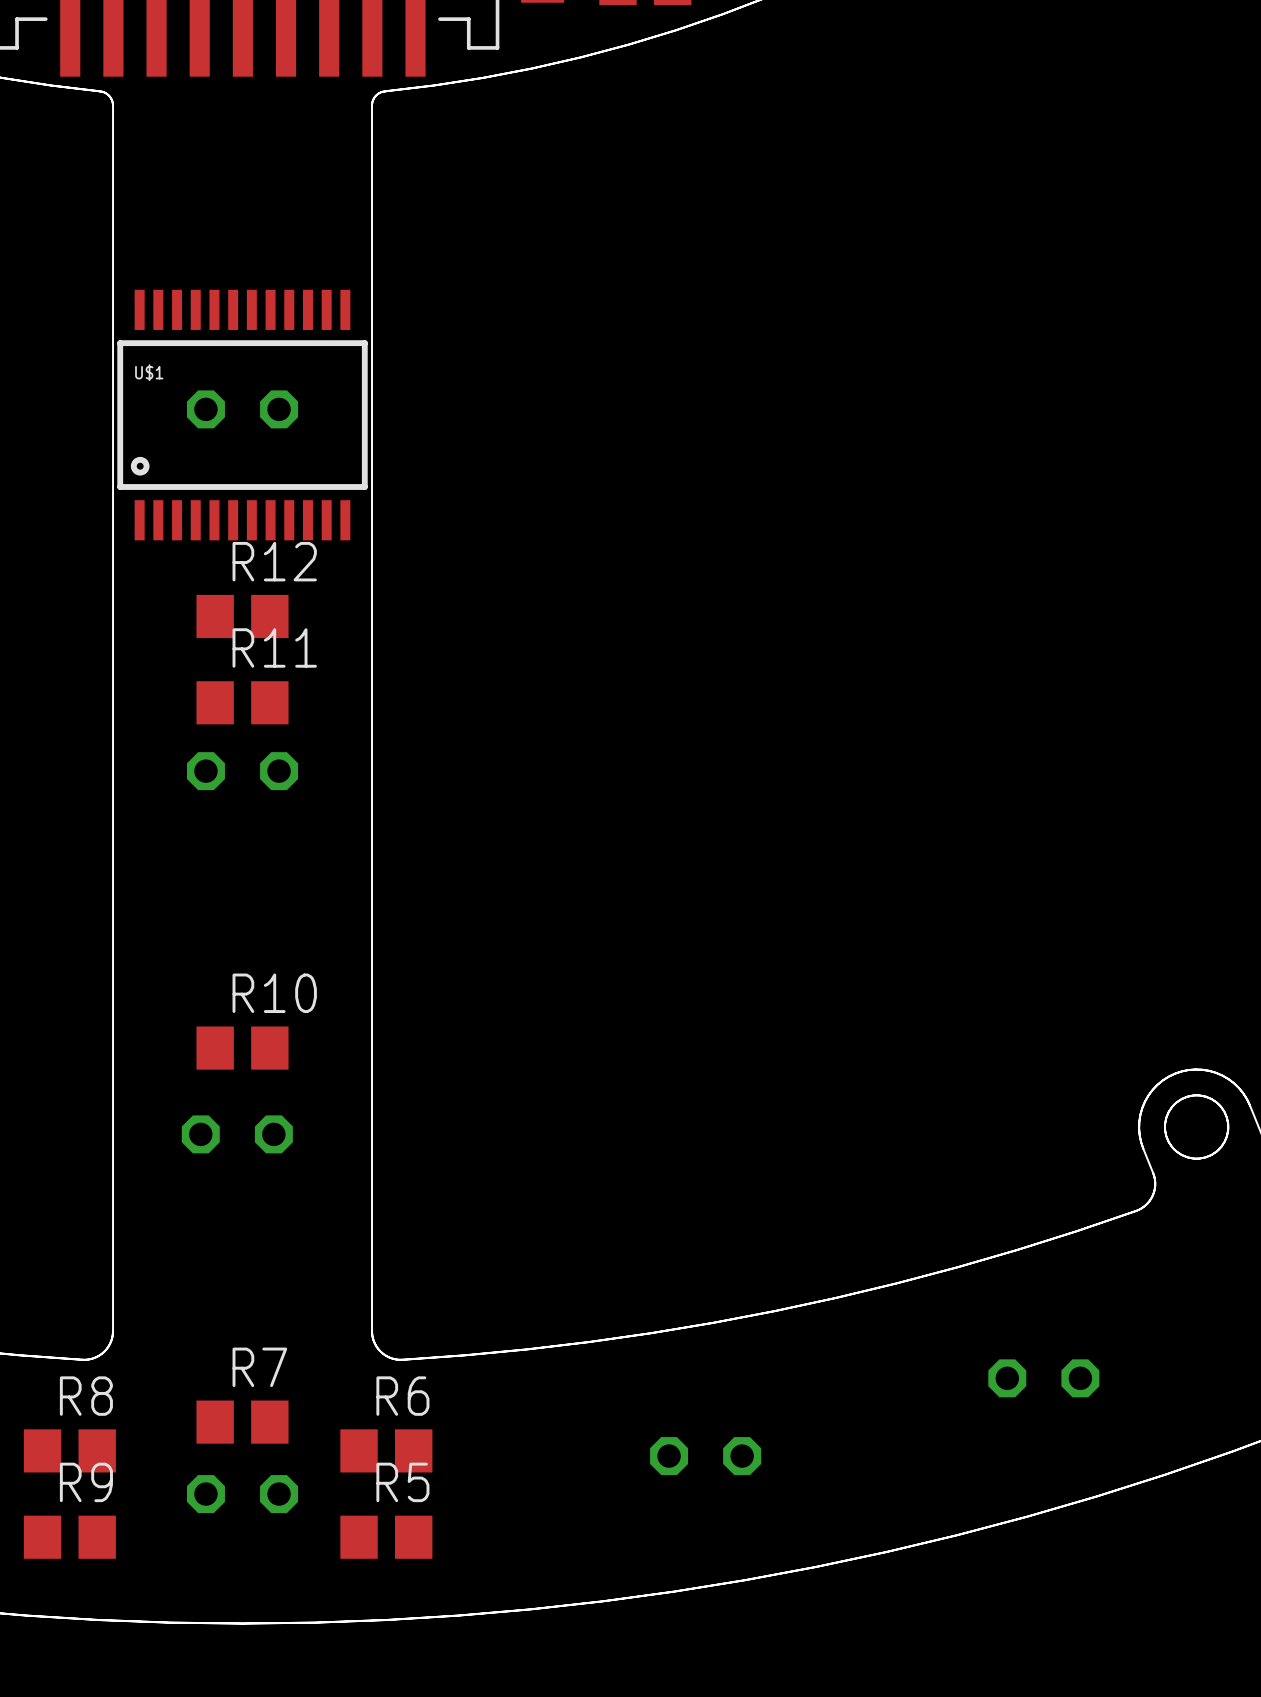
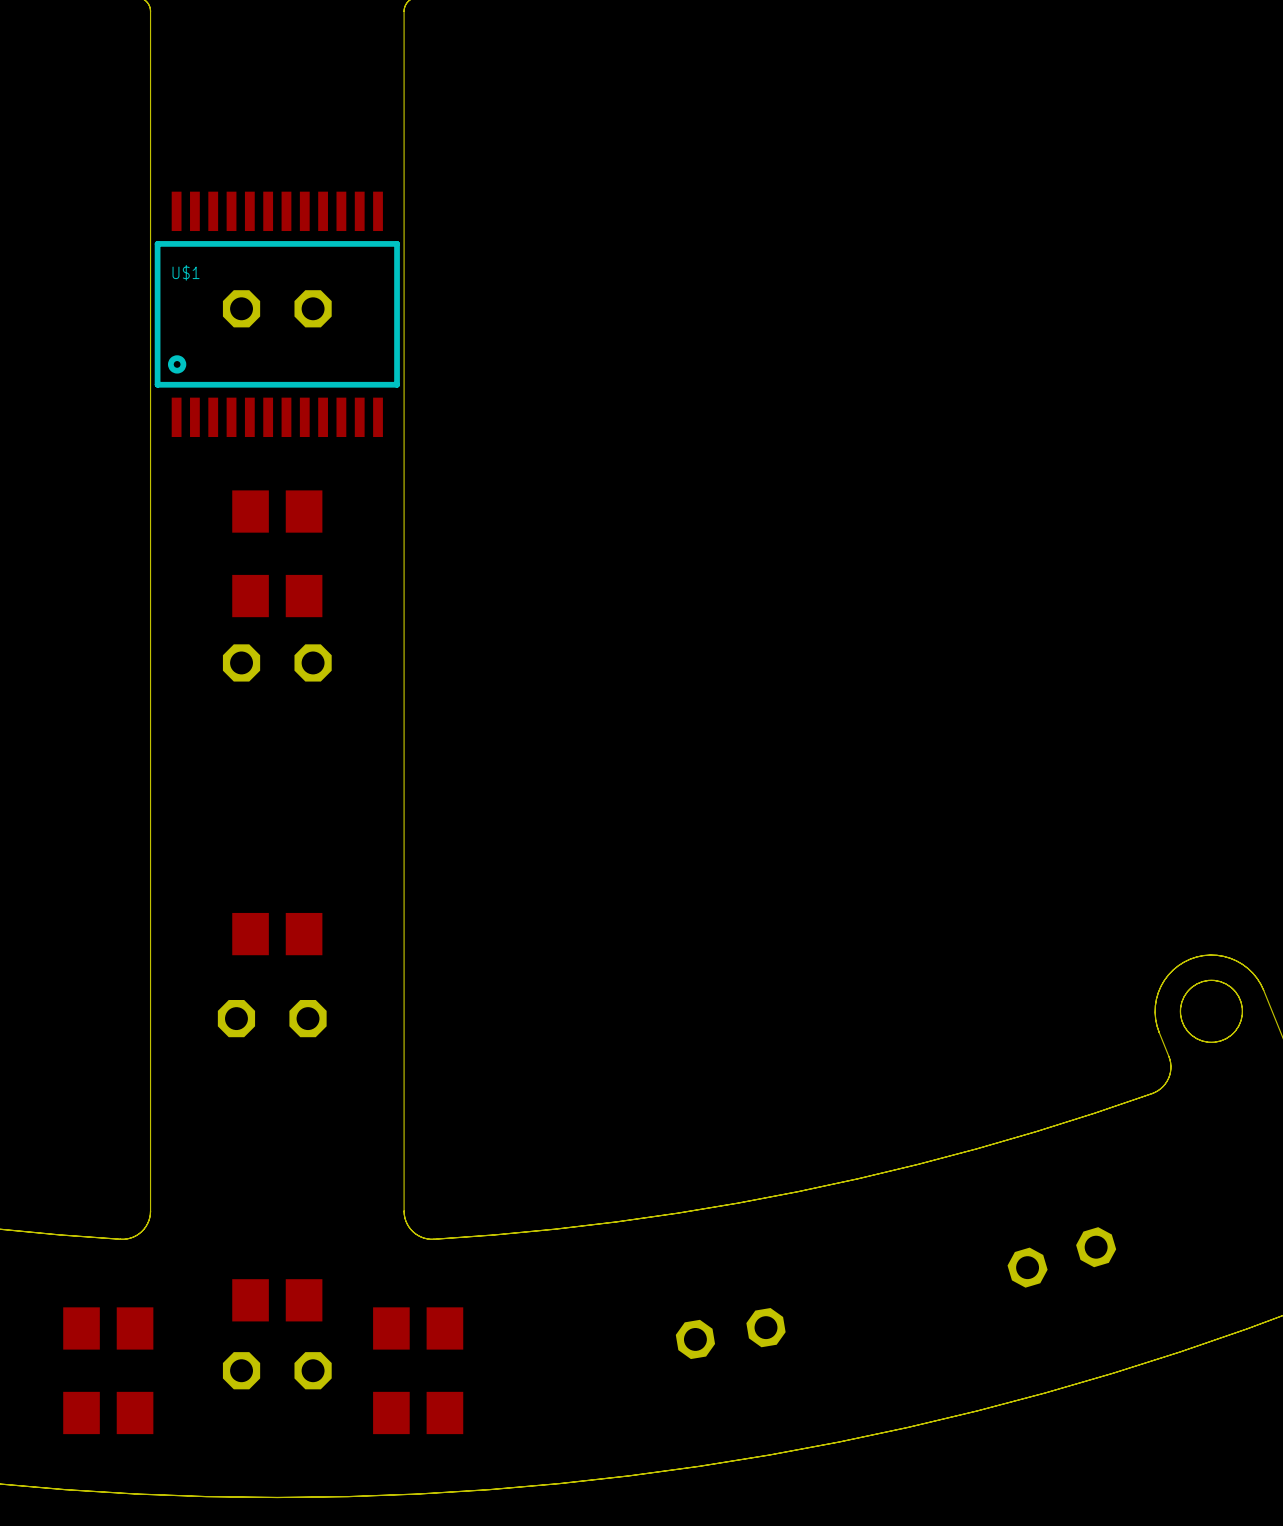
R12 name: R12 (274, 561) -> none
R11 name: R11 (274, 647) -> none
R10 name: R10 (274, 993) -> none
R7 name: R7 (259, 1367) -> none
part rotation: 0° (1043, 1378) -> 16.6° counterclockwise (1061, 1257)
R8 name: R8 (86, 1396) -> none
R6 name: R6 (402, 1396) -> none
part rotation: 0° (705, 1456) -> 9.5° counterclockwise (730, 1333)
R9 name: R9 (86, 1482) -> none
R5 name: R5 (402, 1482) -> none

